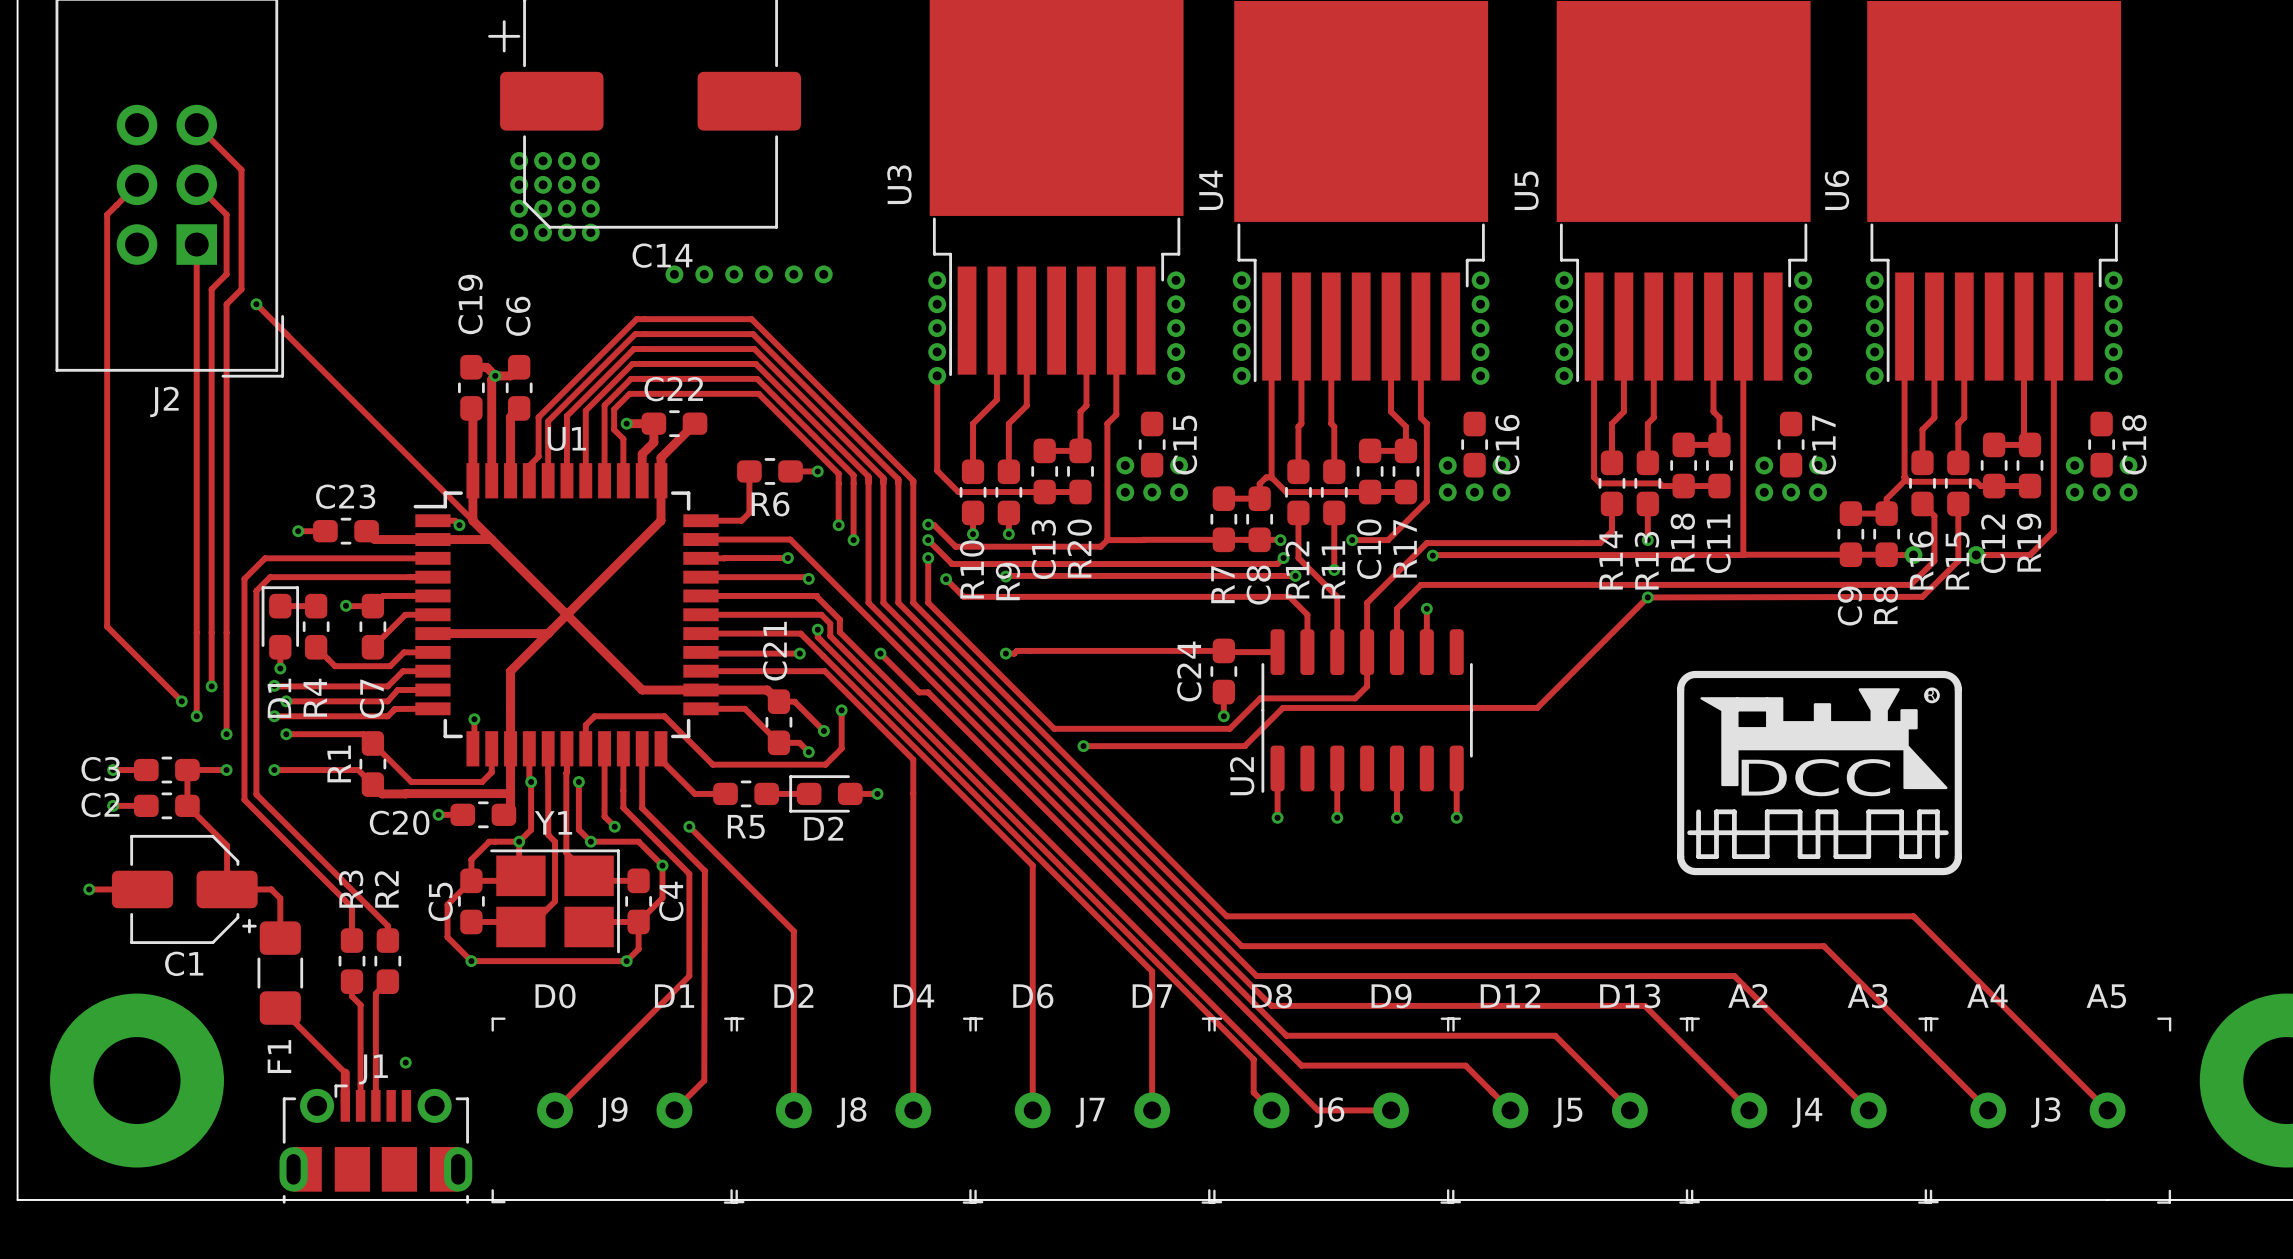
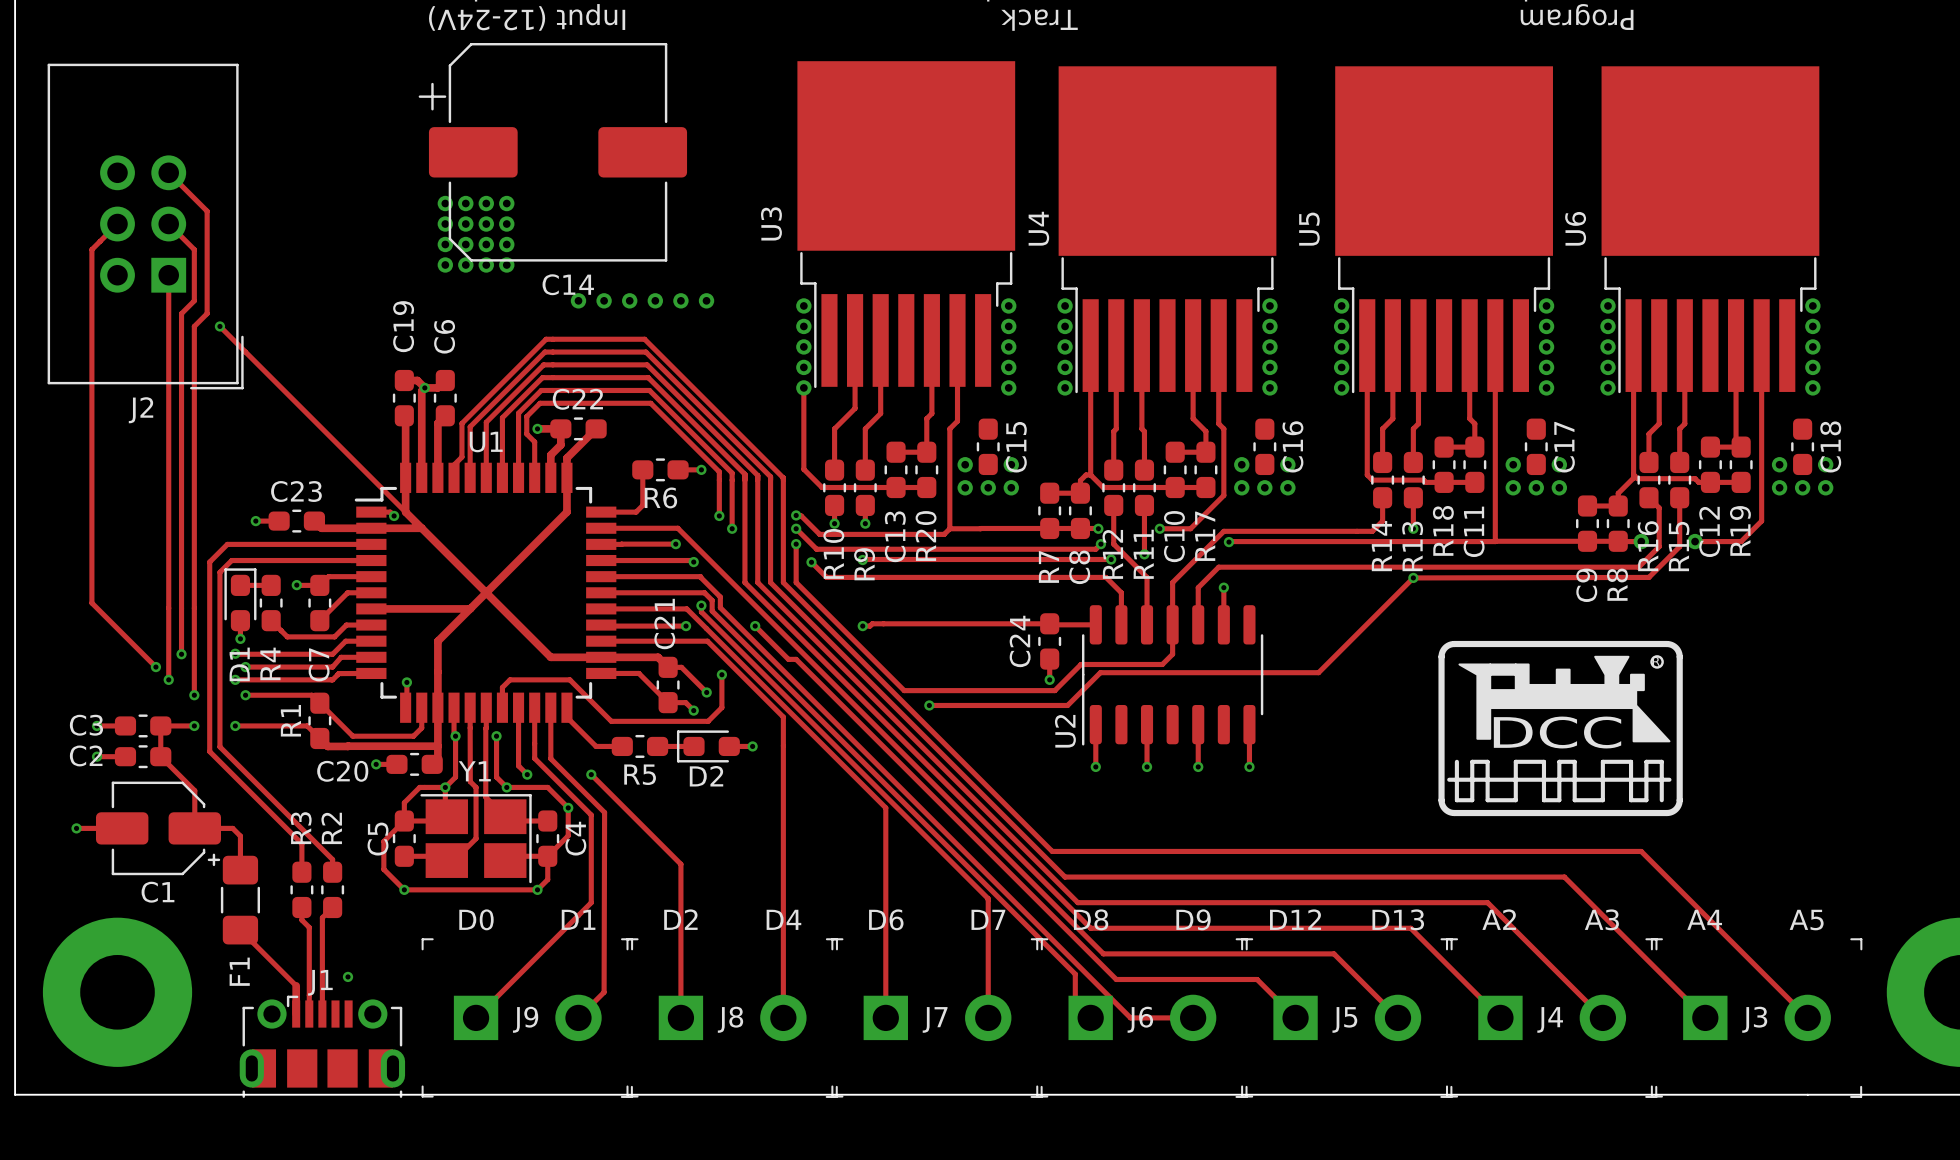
J9 footprint: [491, 1017, 739, 1204] -> [421, 938, 634, 1098]
J8 footprint: [730, 1017, 977, 1204] -> [626, 938, 838, 1098]
J7 footprint: [969, 1017, 1216, 1204] -> [831, 938, 1043, 1098]
J6 footprint: [1208, 1017, 1455, 1204] -> [1036, 938, 1248, 1098]
J5 footprint: [1446, 1017, 1694, 1204] -> [1241, 938, 1453, 1098]
J4 footprint: [1685, 1017, 1933, 1204] -> [1445, 938, 1658, 1098]
J3 footprint: [1924, 1017, 2172, 1204] -> [1650, 938, 1863, 1098]

